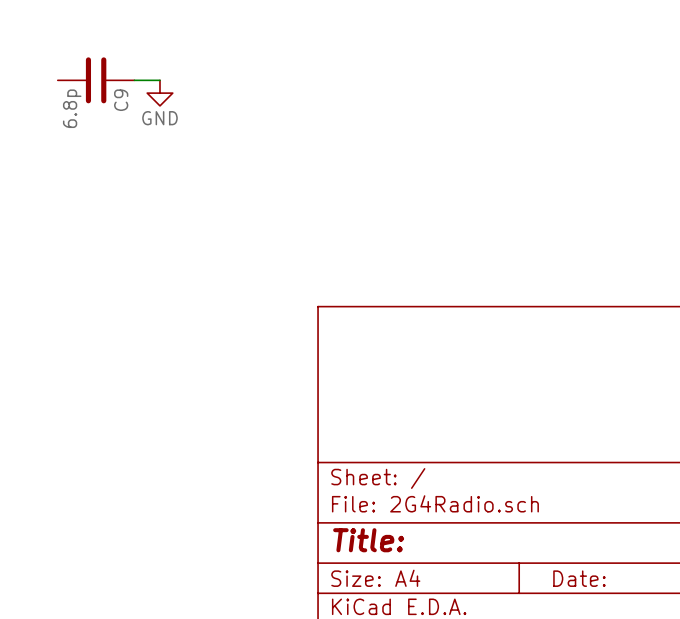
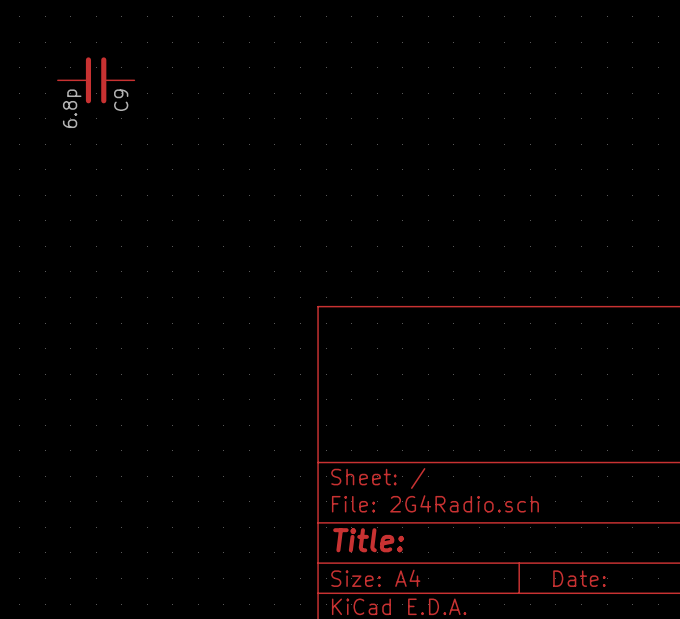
wire: (134, 80) (159, 80) -> none
power symbol: GND (159, 93) -> none

